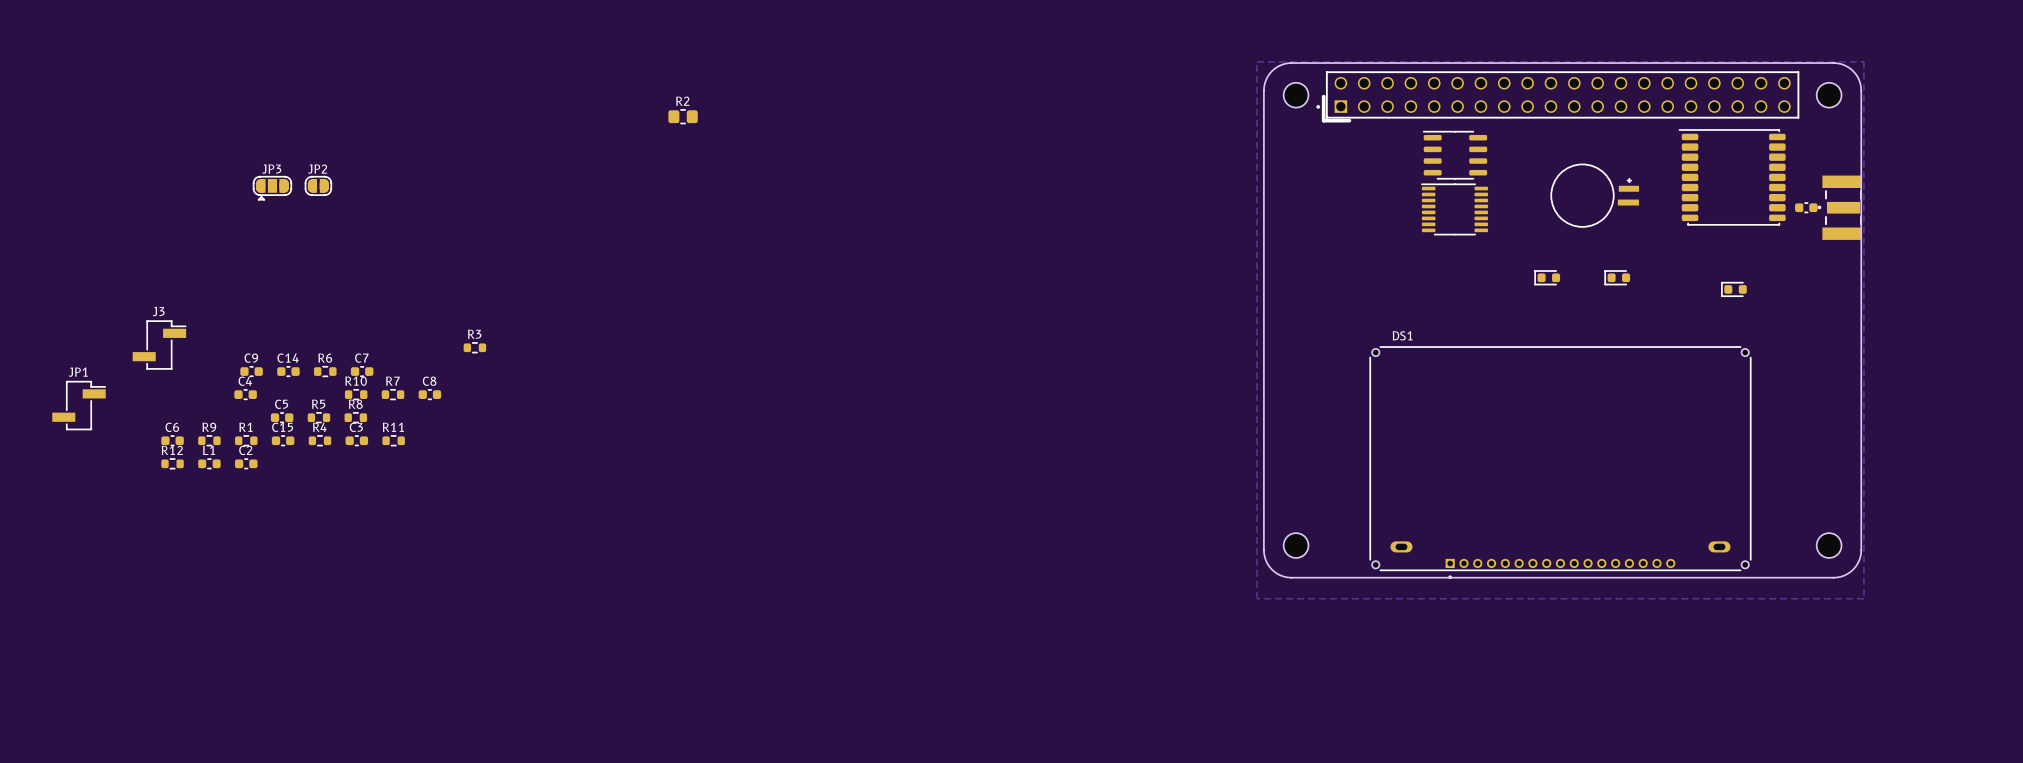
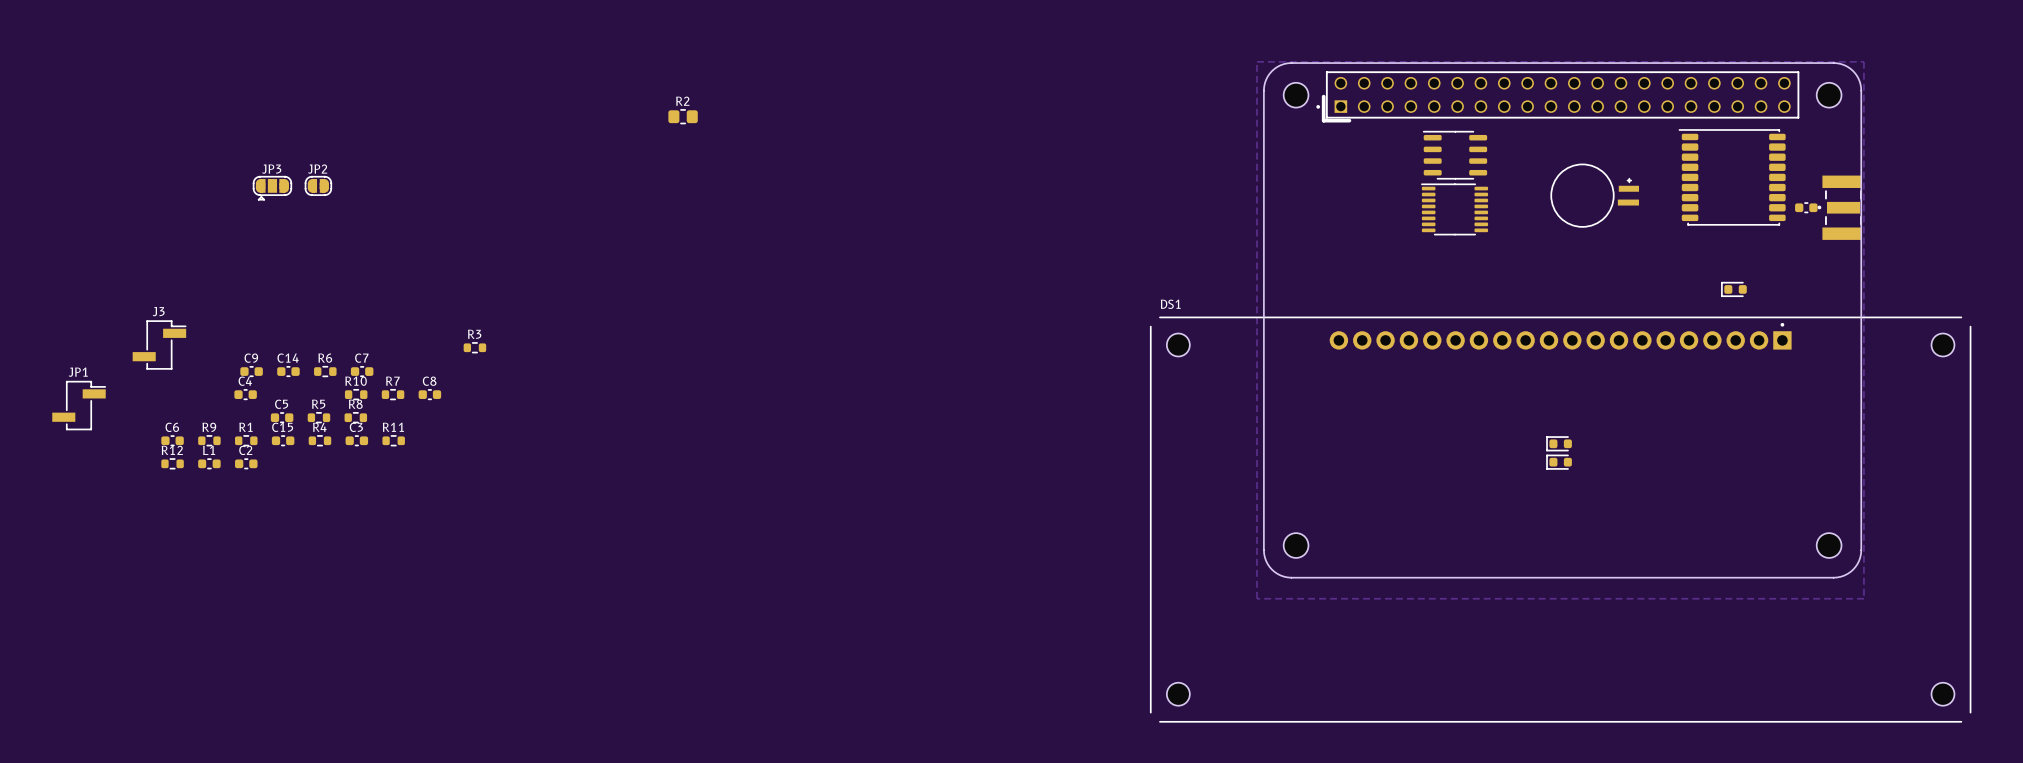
part: (1547, 277) -> none
part: (1617, 277) -> none
DS1 name position: DS1 (1402, 335) -> DS1 (1170, 304)
DS1 footprint: [1369, 346, 1752, 580] -> [1150, 316, 1972, 723]
part: none -> (1559, 443)
part: none -> (1559, 462)

